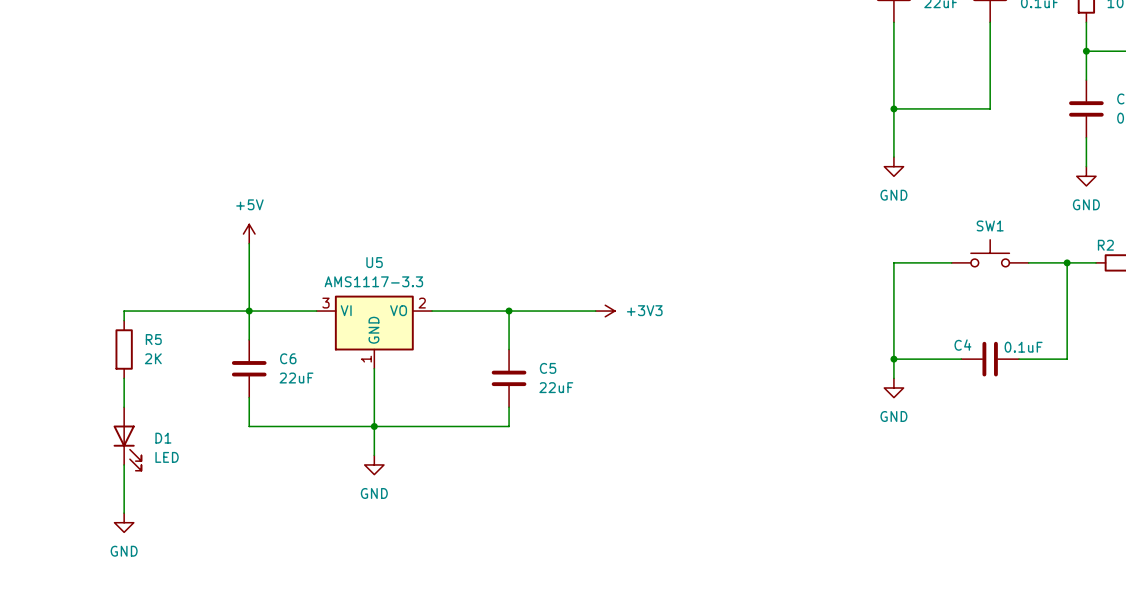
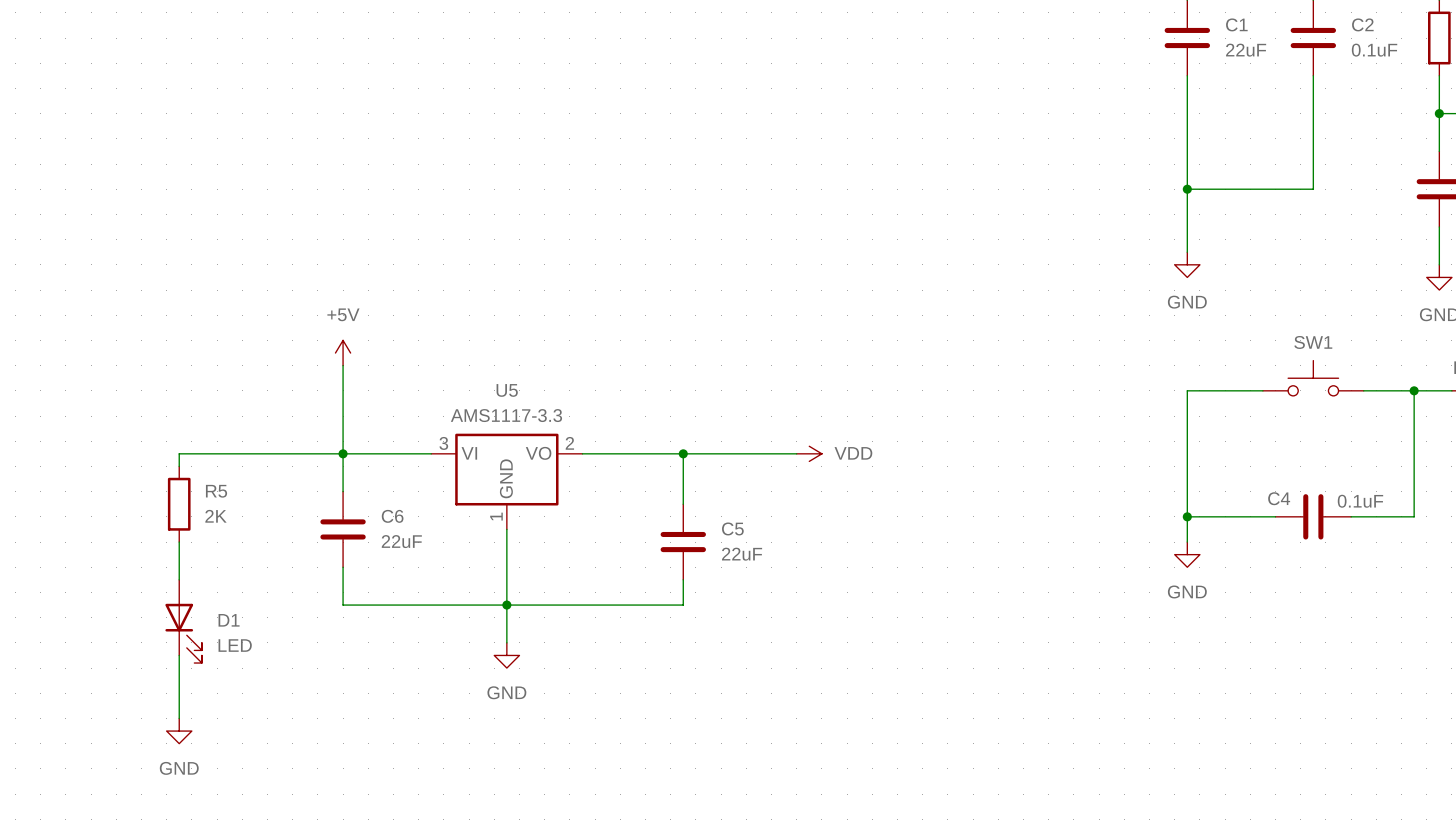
power symbol: +3V3 (605, 311) -> VDD (809, 453)

